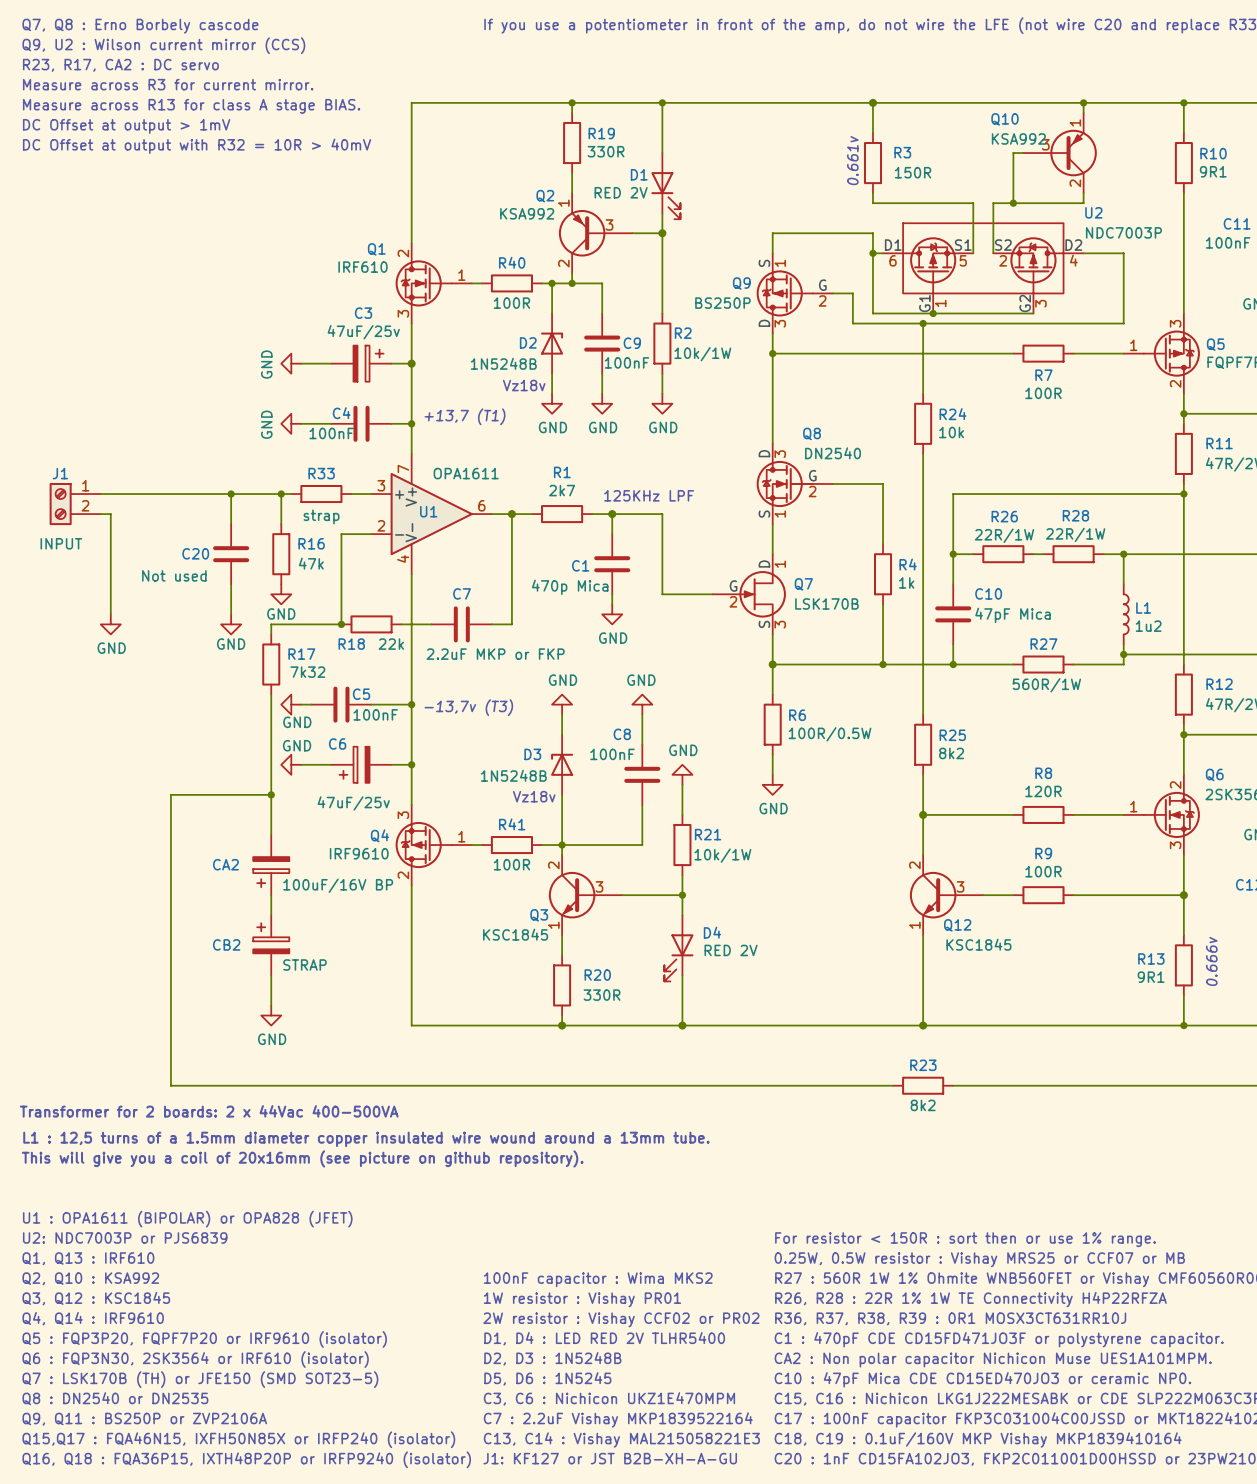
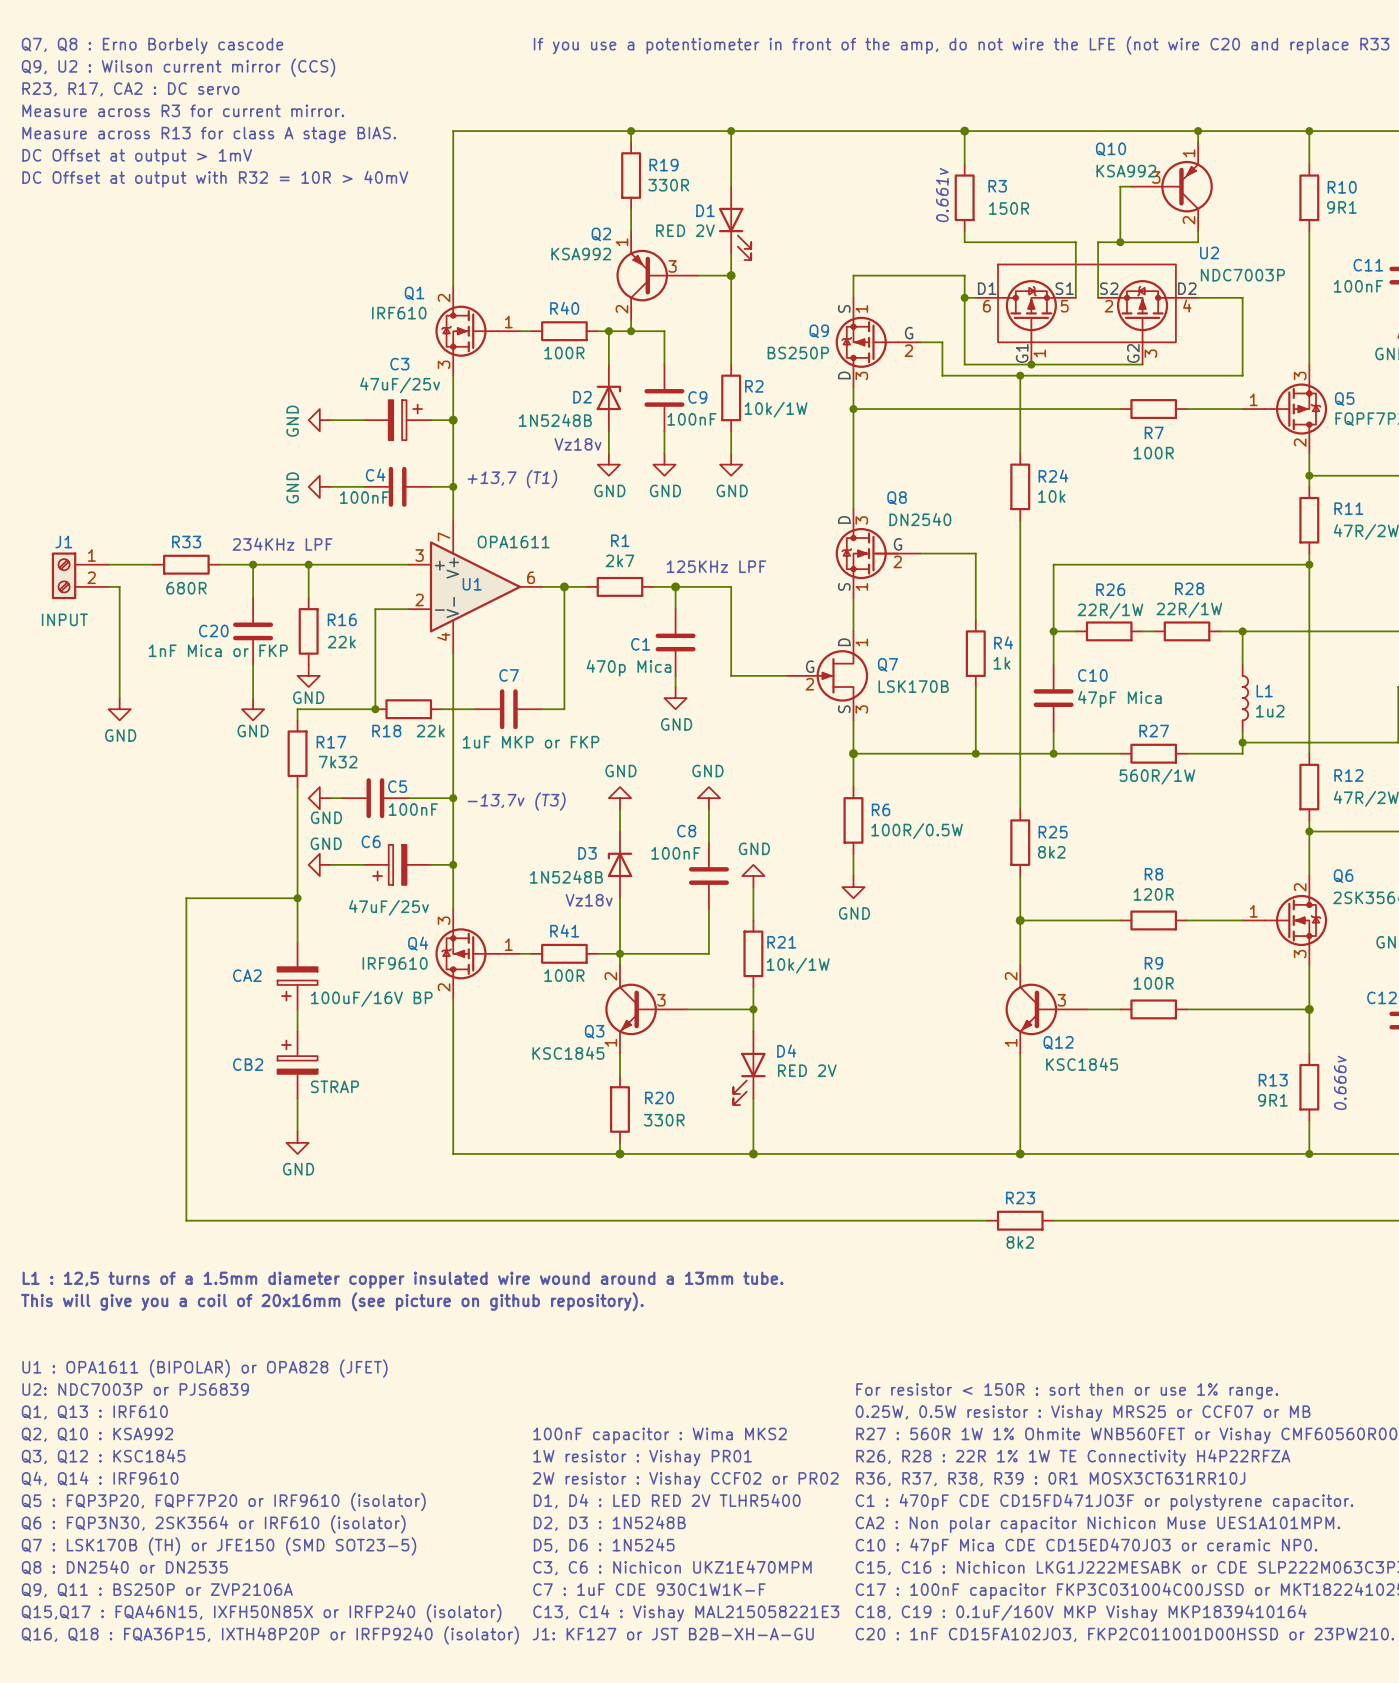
text: none -> 234KHz LPF (282, 544)
wire: (140, 494) (201, 494) -> (319, 564) (386, 564)
R33 position: (321, 494) -> (186, 564)
R33 value: strap (321, 516) -> 680R (186, 588)
R16 value: 47k (311, 563) -> 22k (341, 642)
C20 value: Not used (174, 575) -> 1nF Mica or FKP (218, 650)
C7 value: 2.2uF MKP or FKP (495, 654) -> 1uF MKP or FKP (531, 742)
text: Transformer for 2 boards: 2 x 44Vac 400-500VA (209, 1111) -> none
text: C7 : 2.2uF Vishay MKP1839522164 (618, 1419) -> C7 : 1uF CDE 930C1W1K-F (649, 1589)

